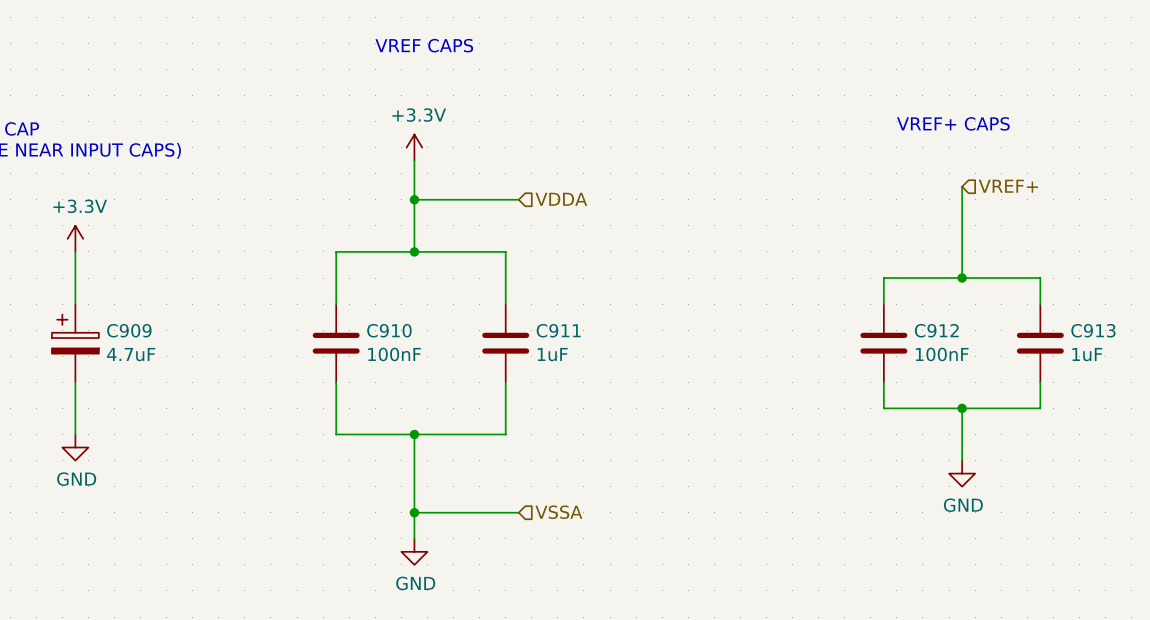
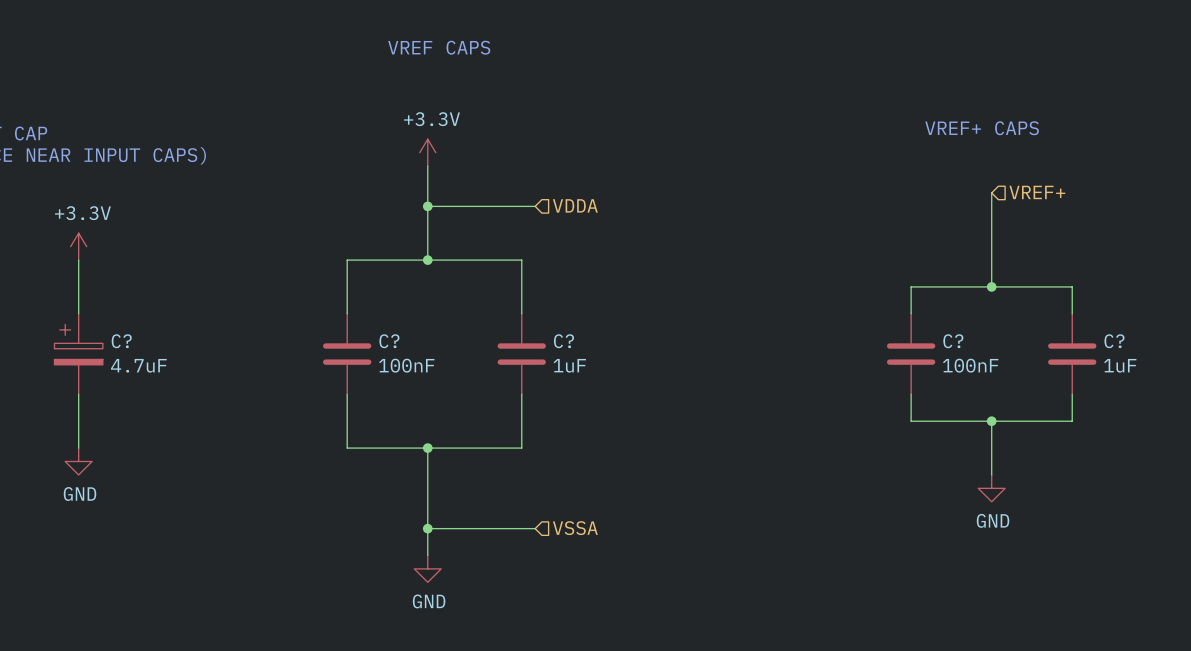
C909 name: C909 (129, 330) -> C? (121, 341)
C910 name: C910 (389, 330) -> C? (389, 341)
C911 name: C911 (558, 330) -> C? (563, 341)
C912 name: C912 (936, 330) -> C? (953, 341)
C913 name: C913 (1093, 330) -> C? (1114, 341)

